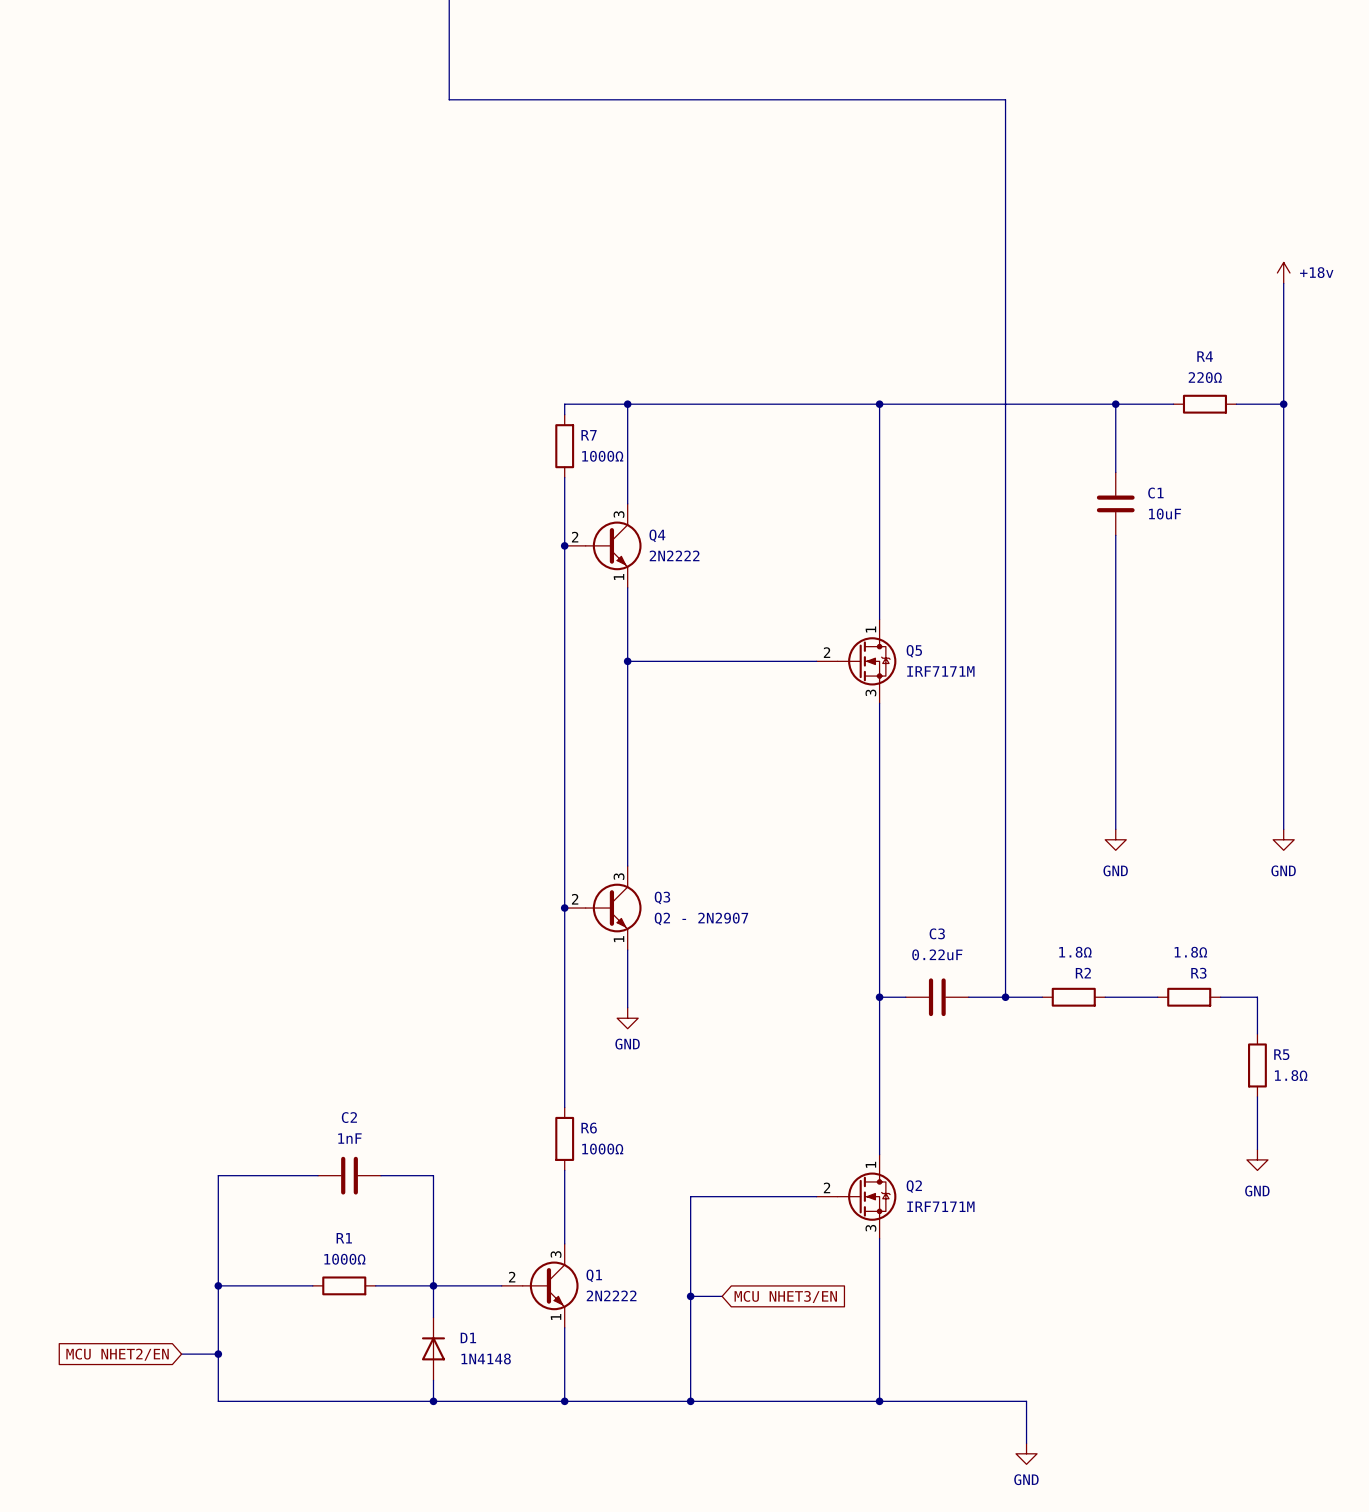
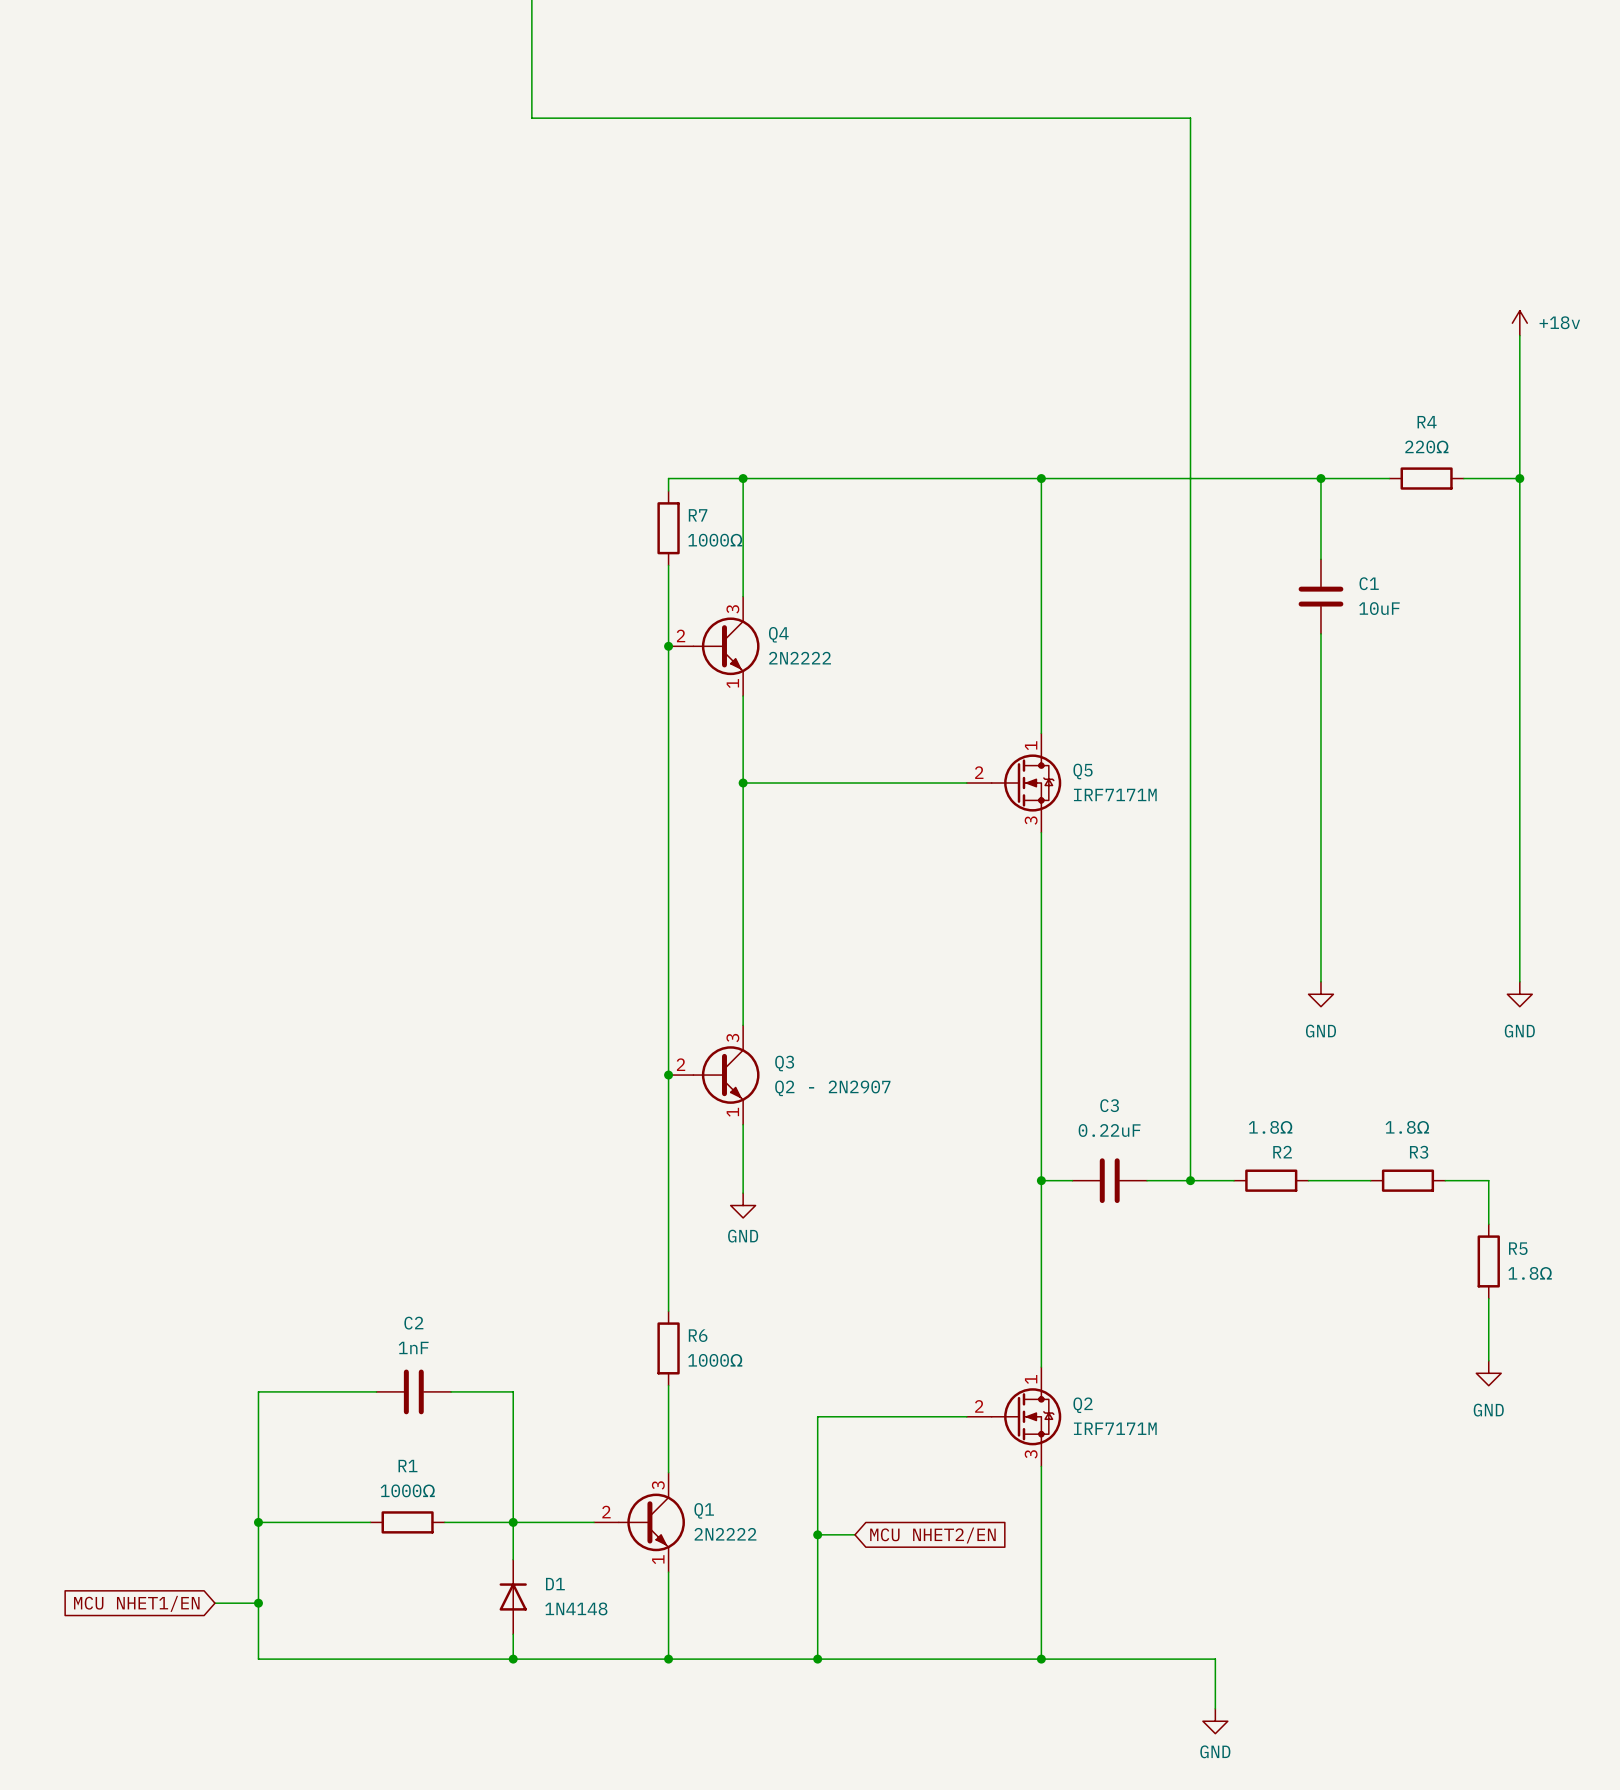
global label: MCU NHET3/EN (785, 1296) -> MCU NHET2/EN (932, 1535)
global label: MCU NHET2/EN (117, 1354) -> MCU NHET1/EN (136, 1603)

